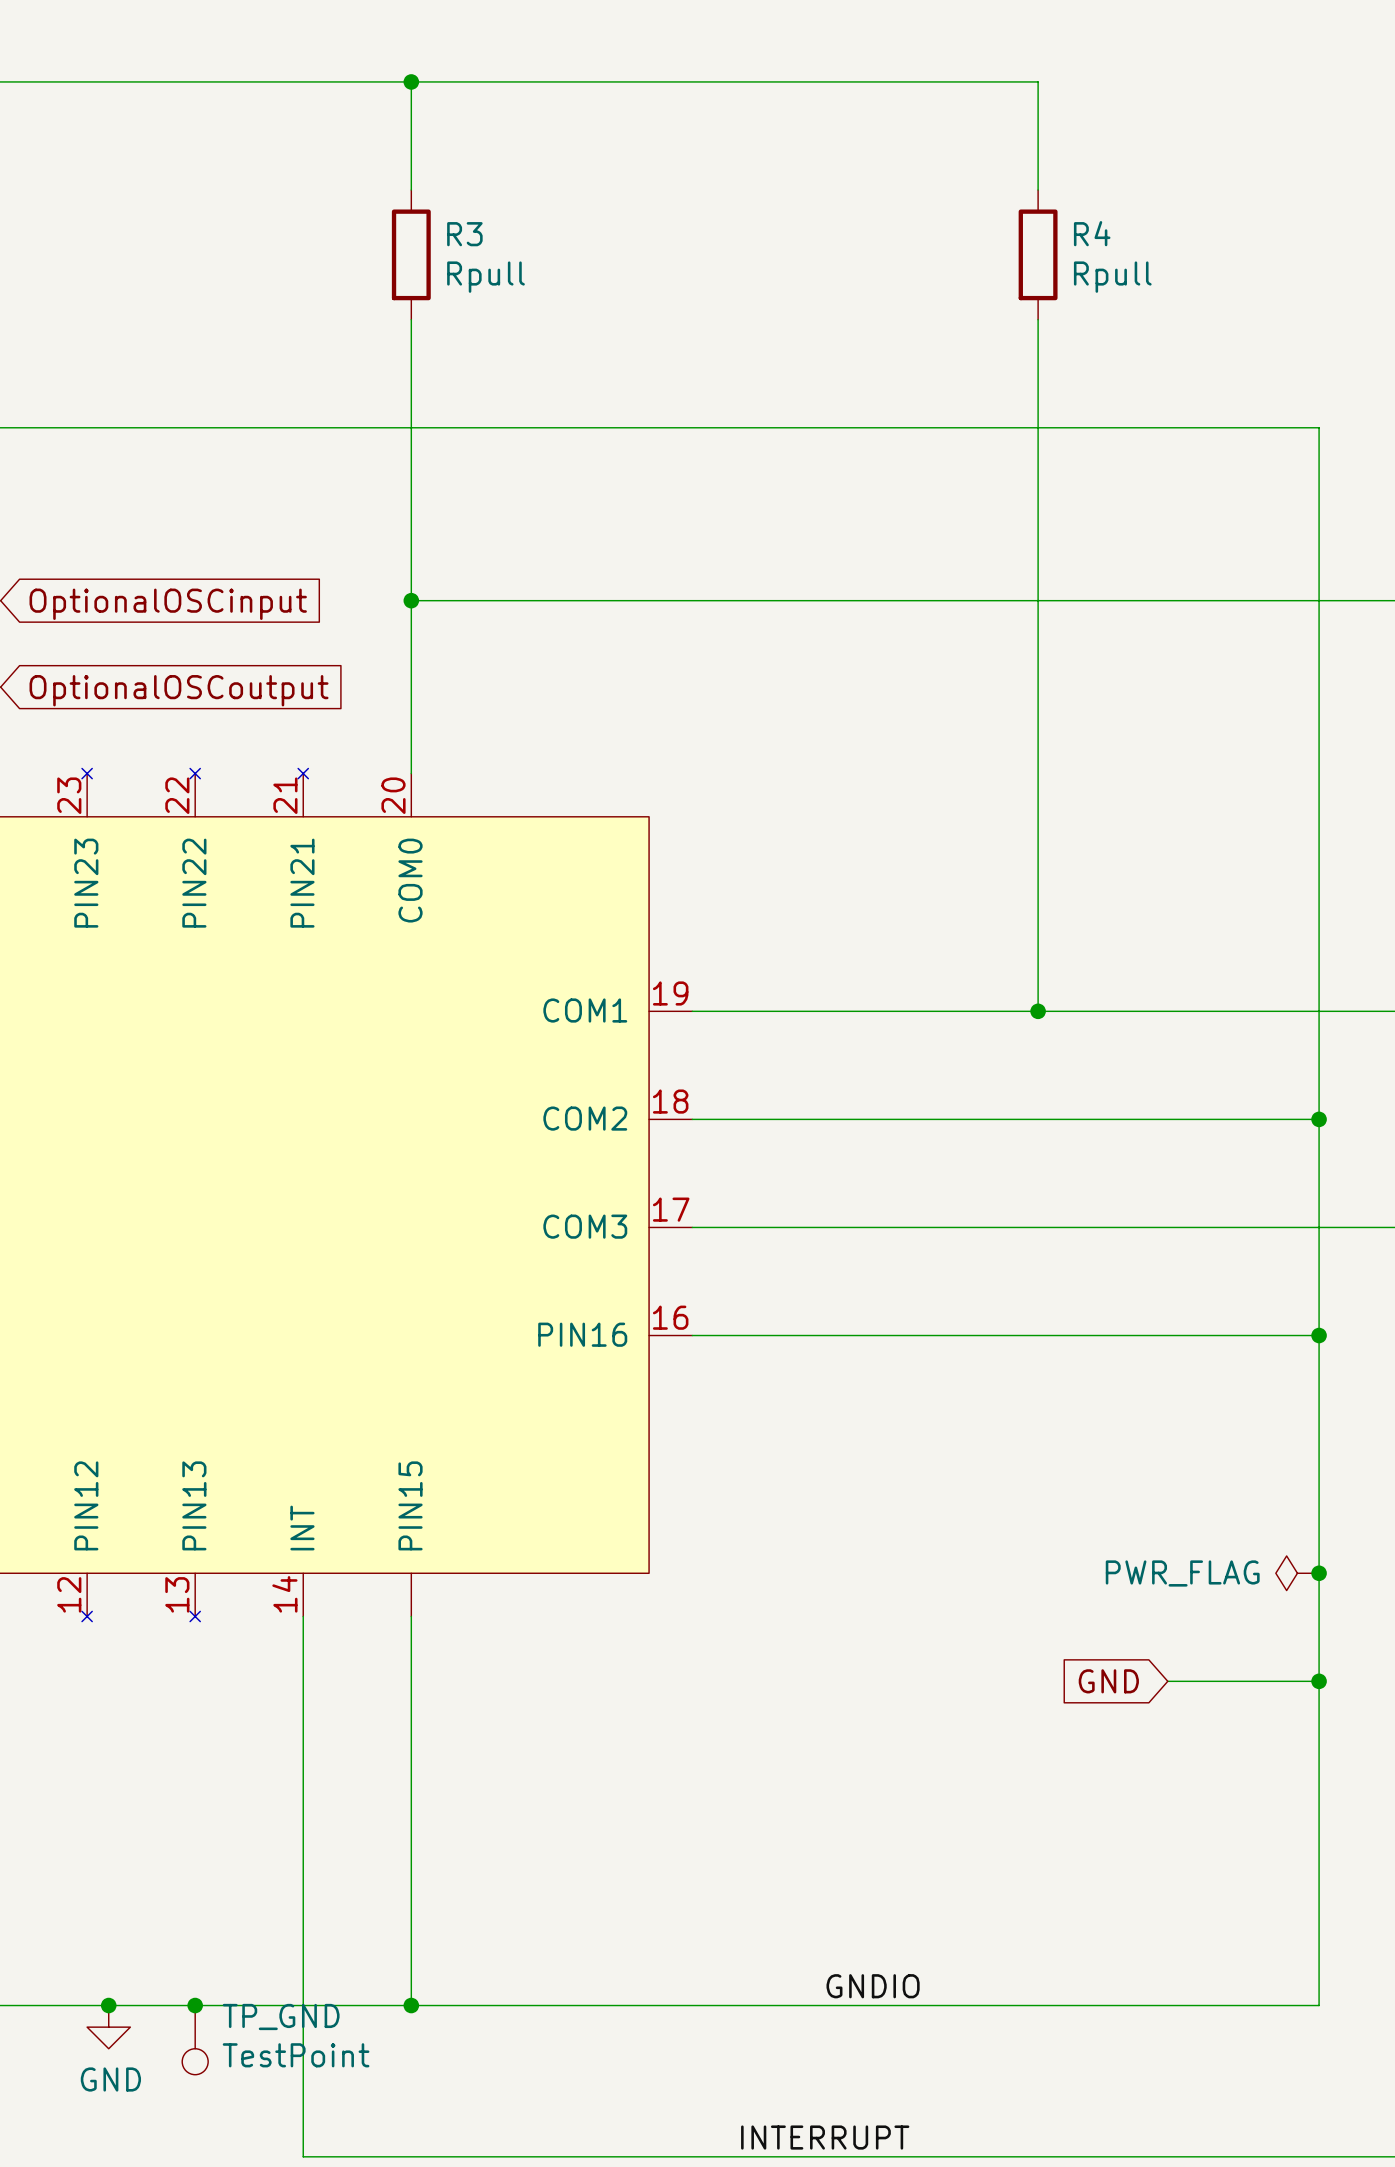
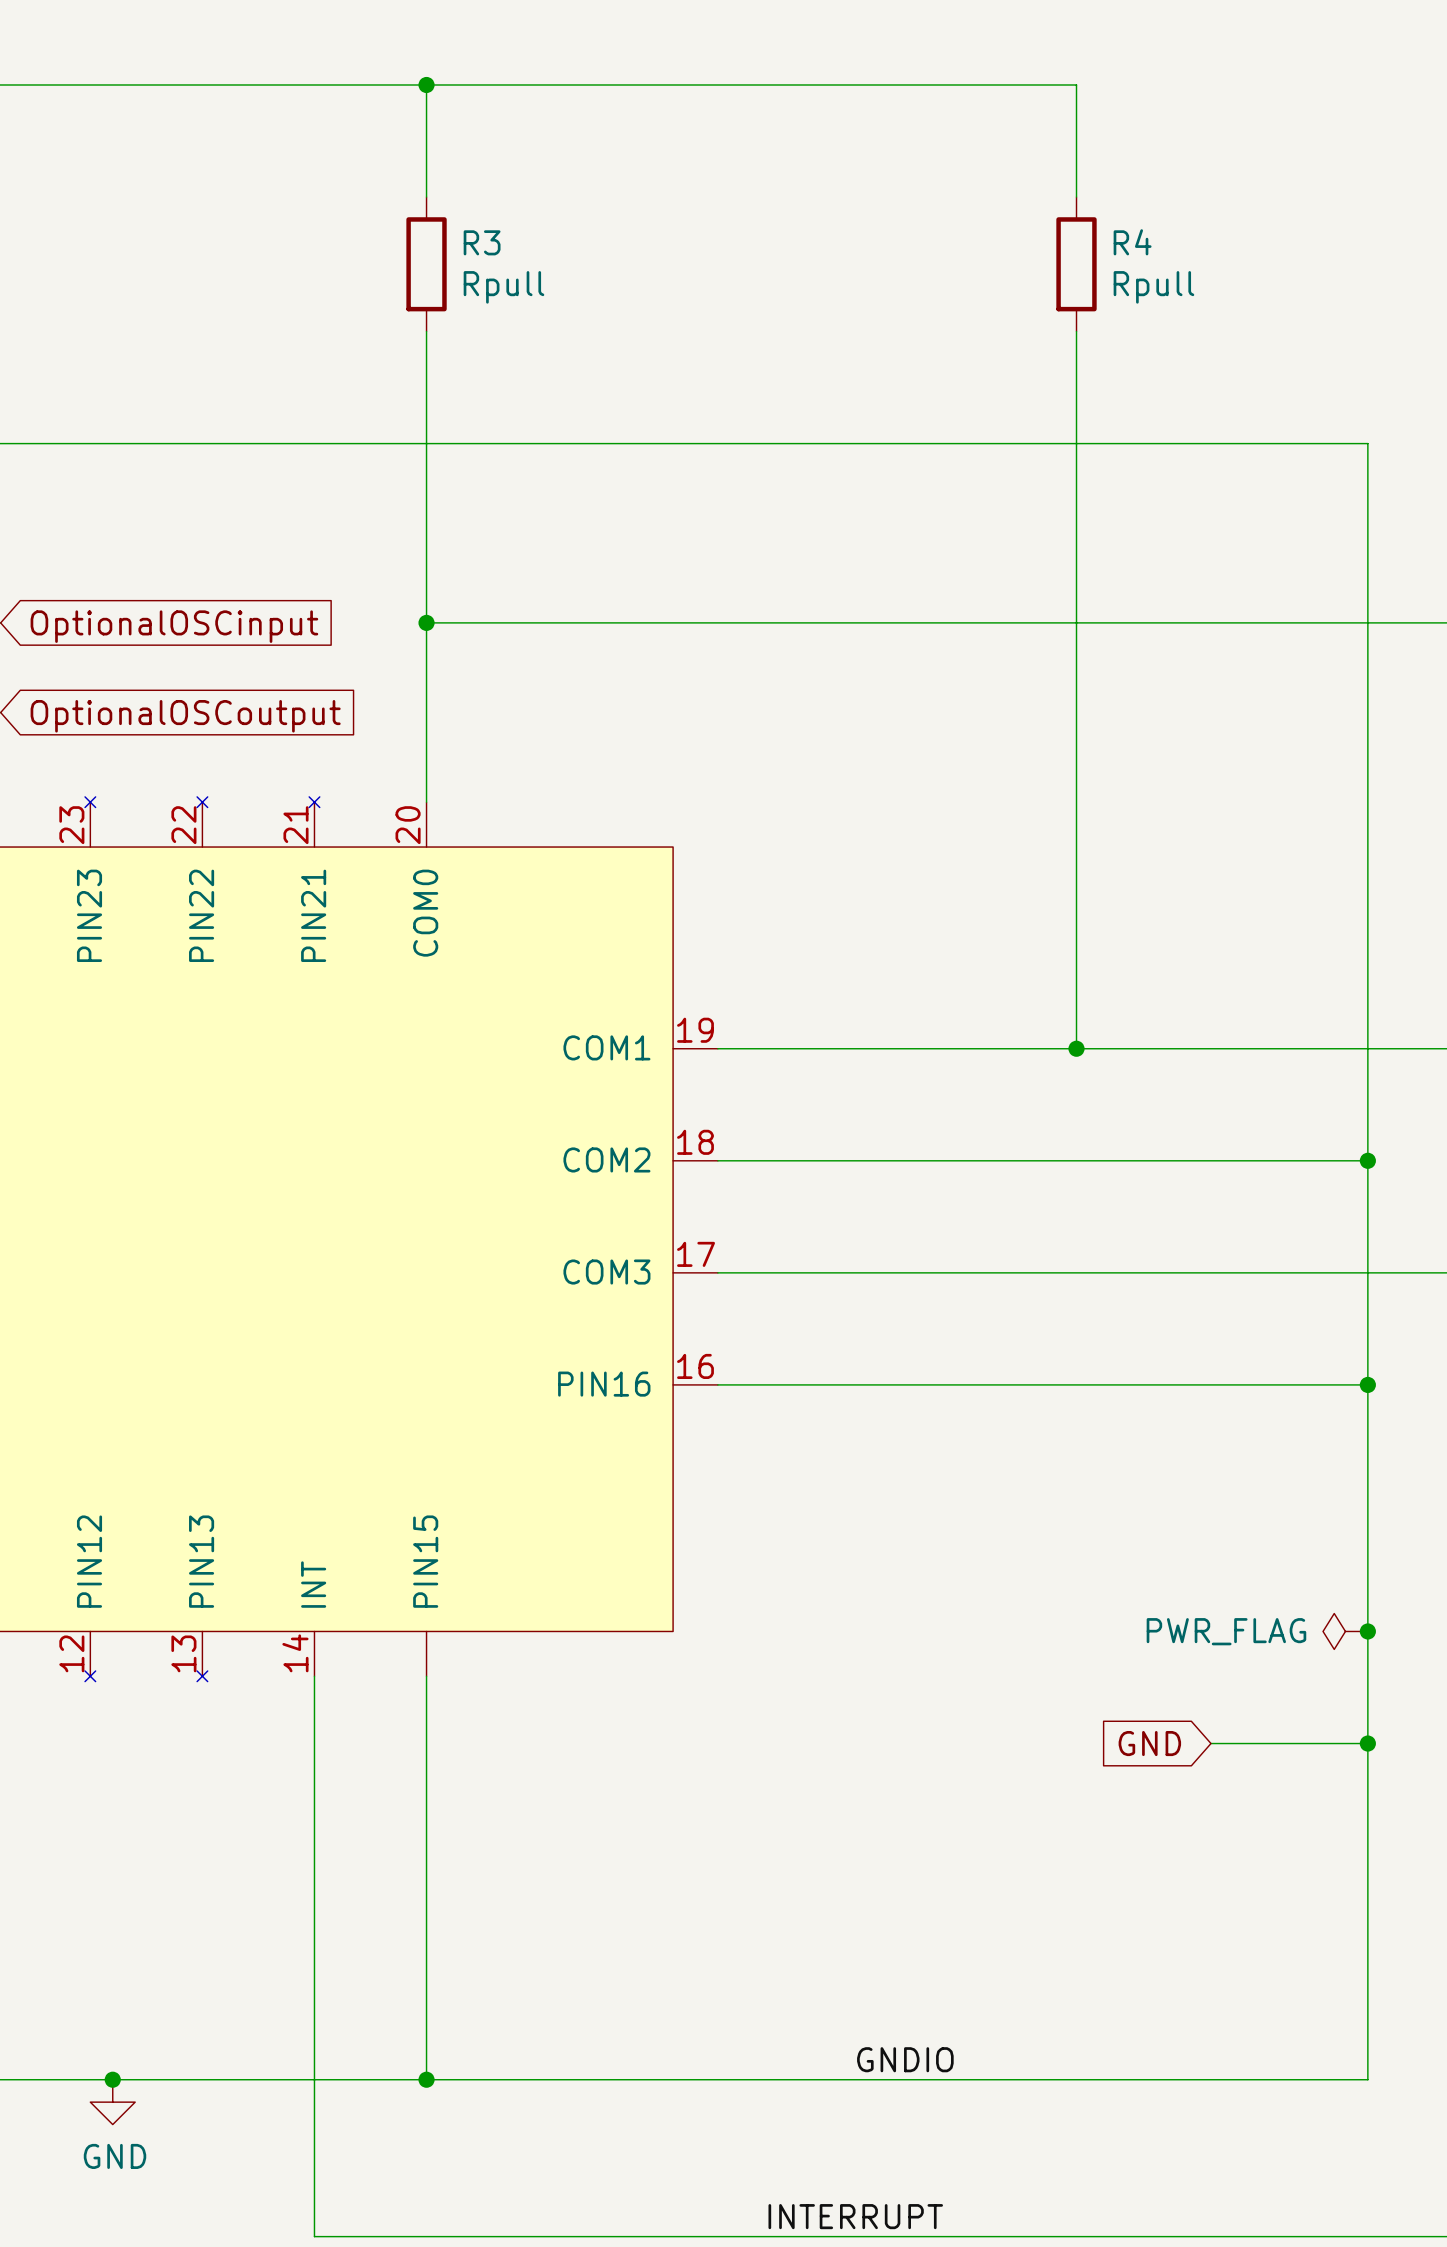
junction: (195, 2005) -> none
TP_GND: TestPoint (195, 2040) -> none

